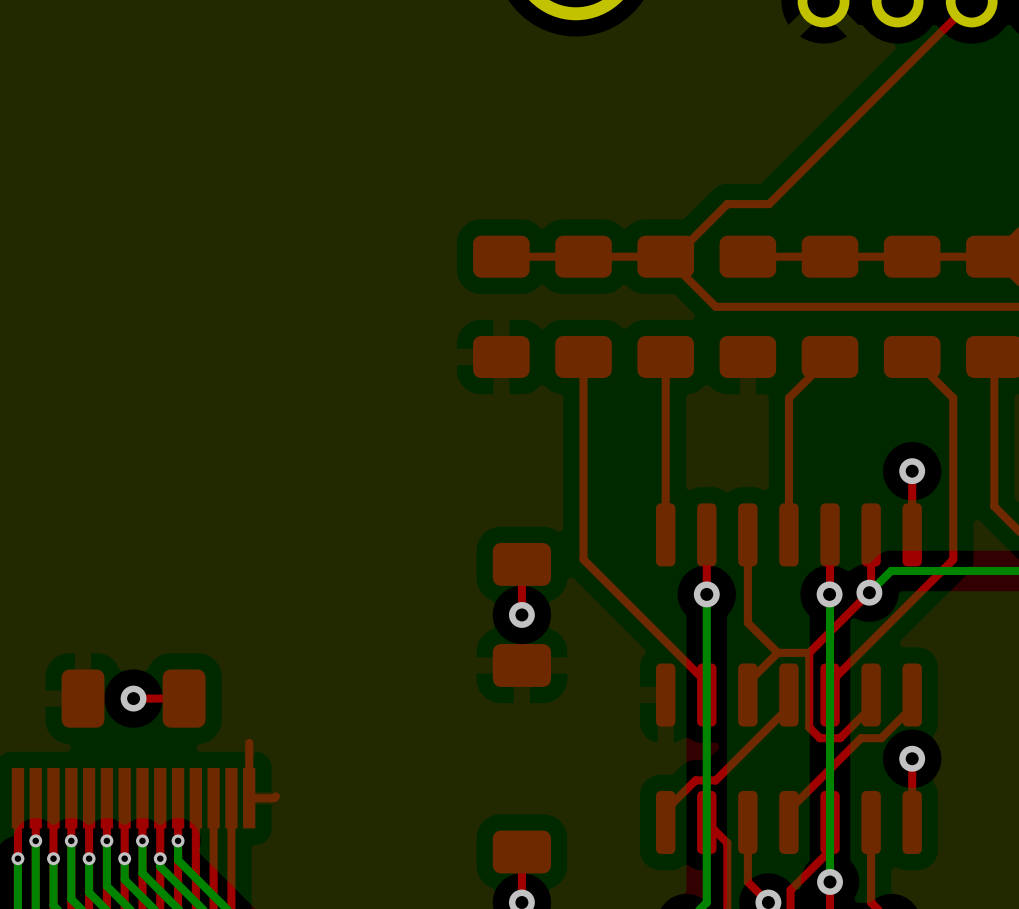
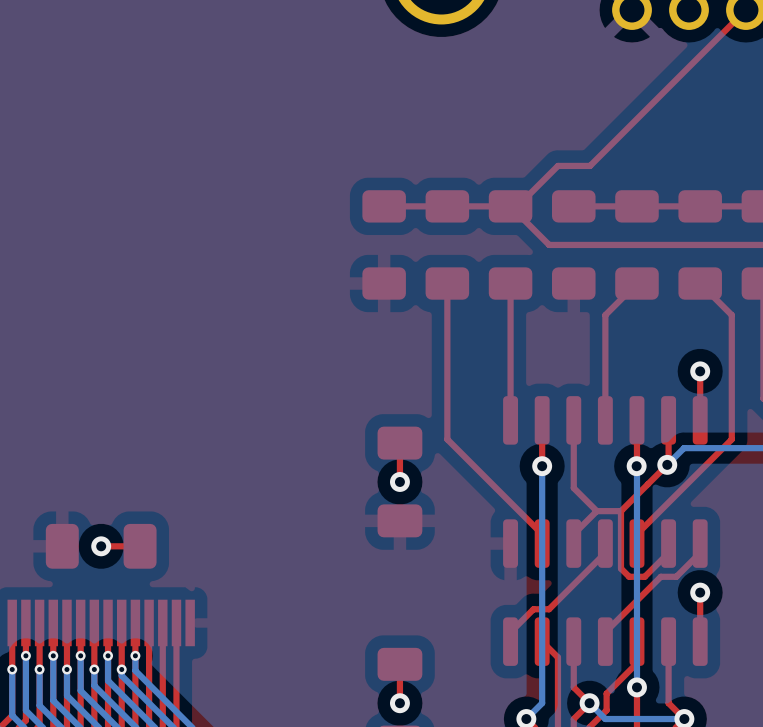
top track: (249, 743) (249, 798) (274, 798) (275, 796) -> none

